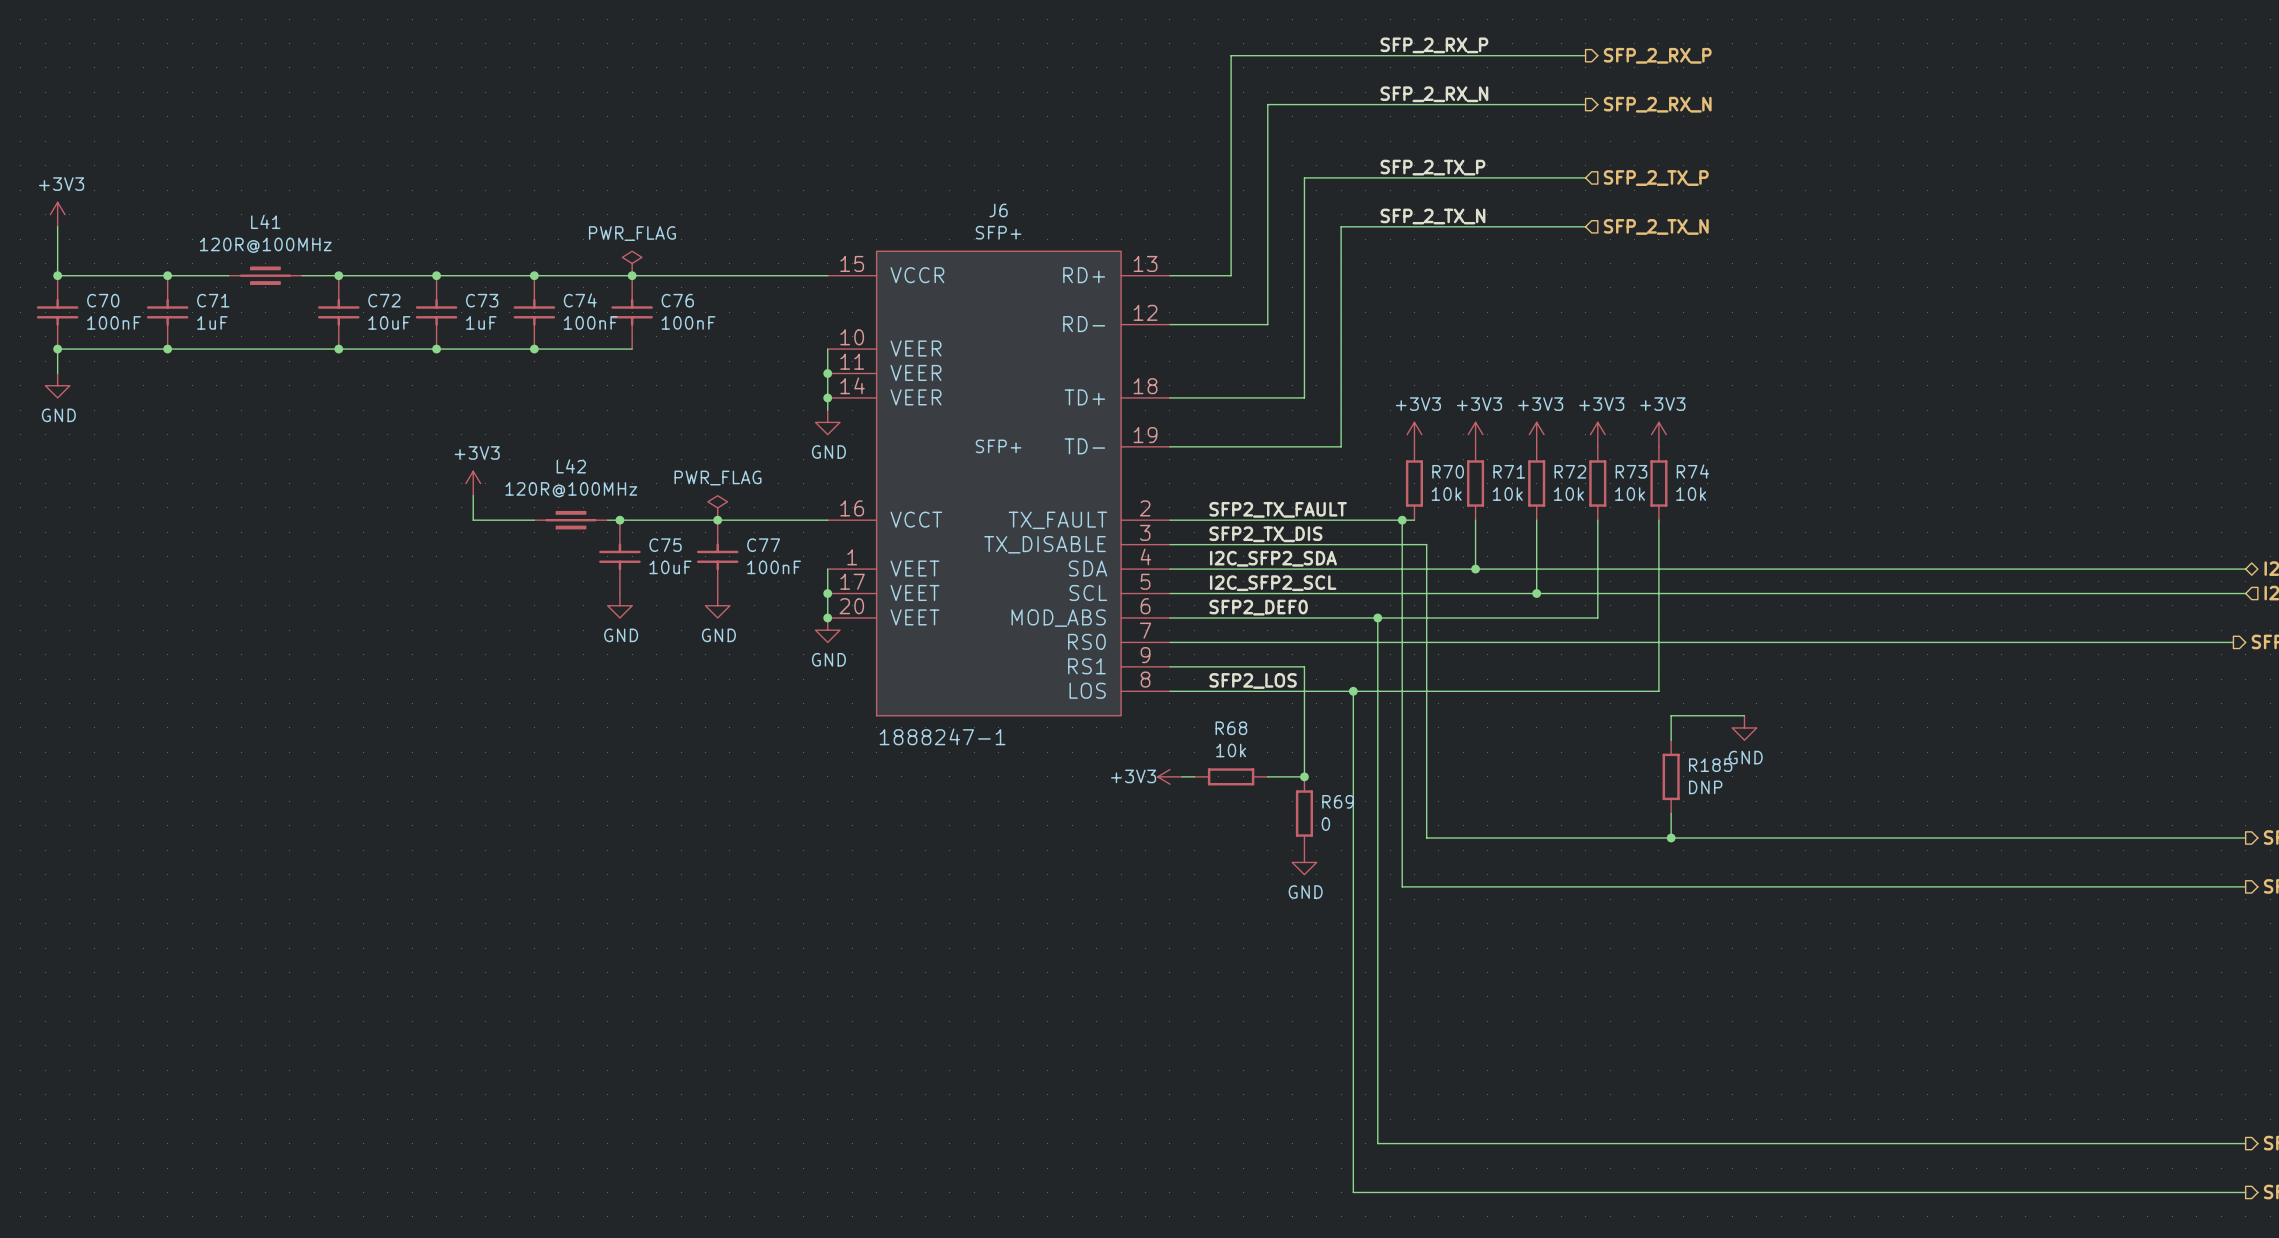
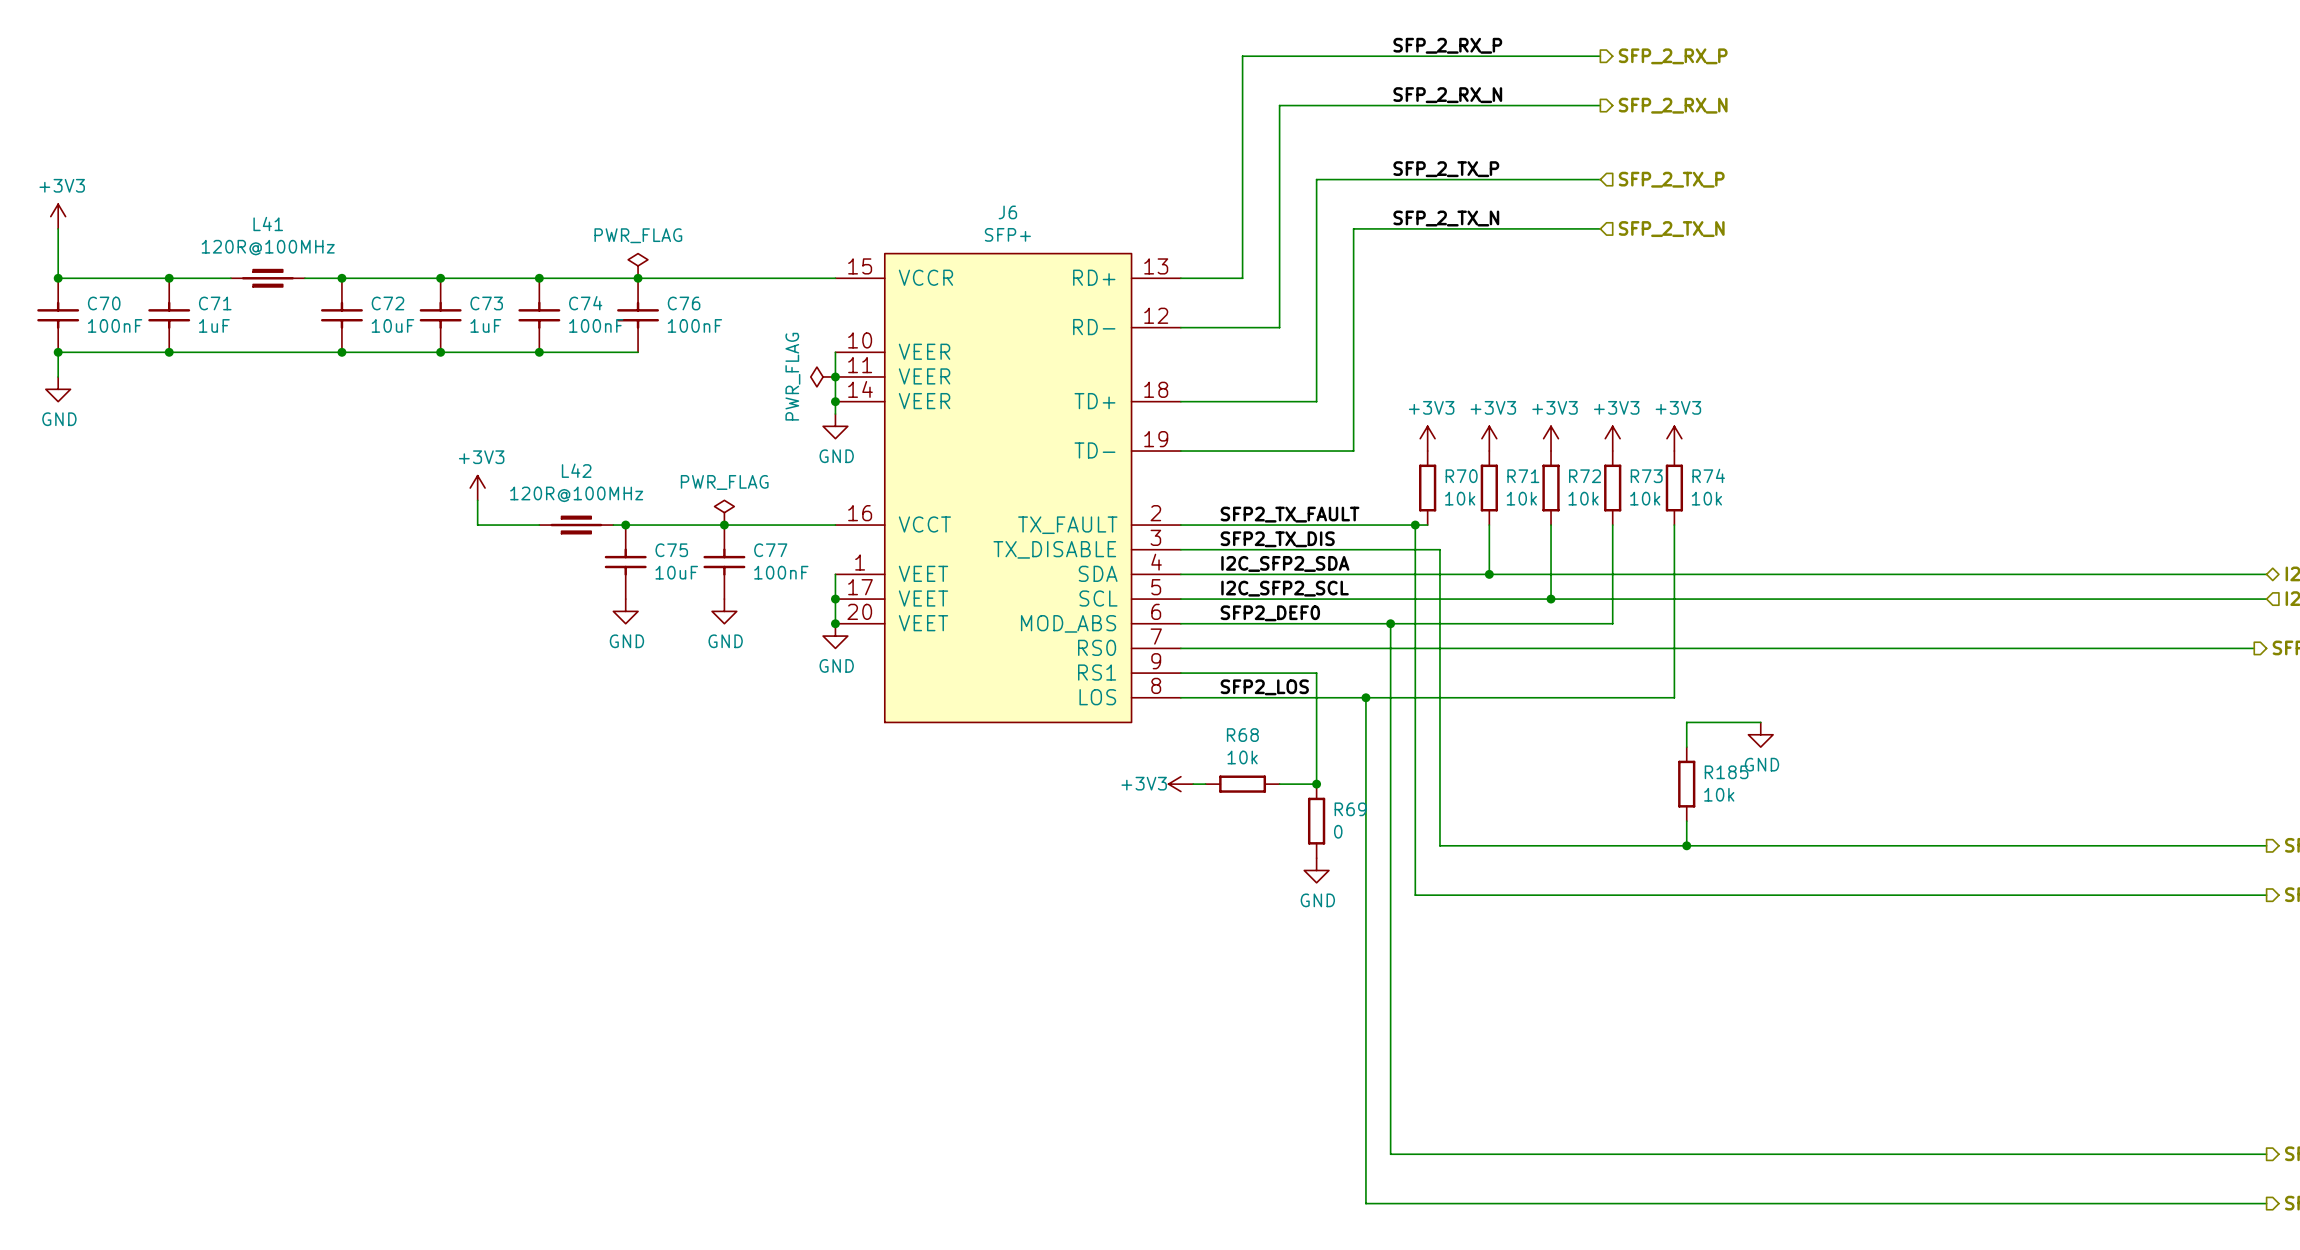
power symbol: none -> PWR_FLAG (823, 376)
J6 text: SFP+ (998, 446) -> none
J6 value: 1888247-1 (942, 736) -> none
R185 text: DNP (1705, 787) -> 10k (1719, 794)

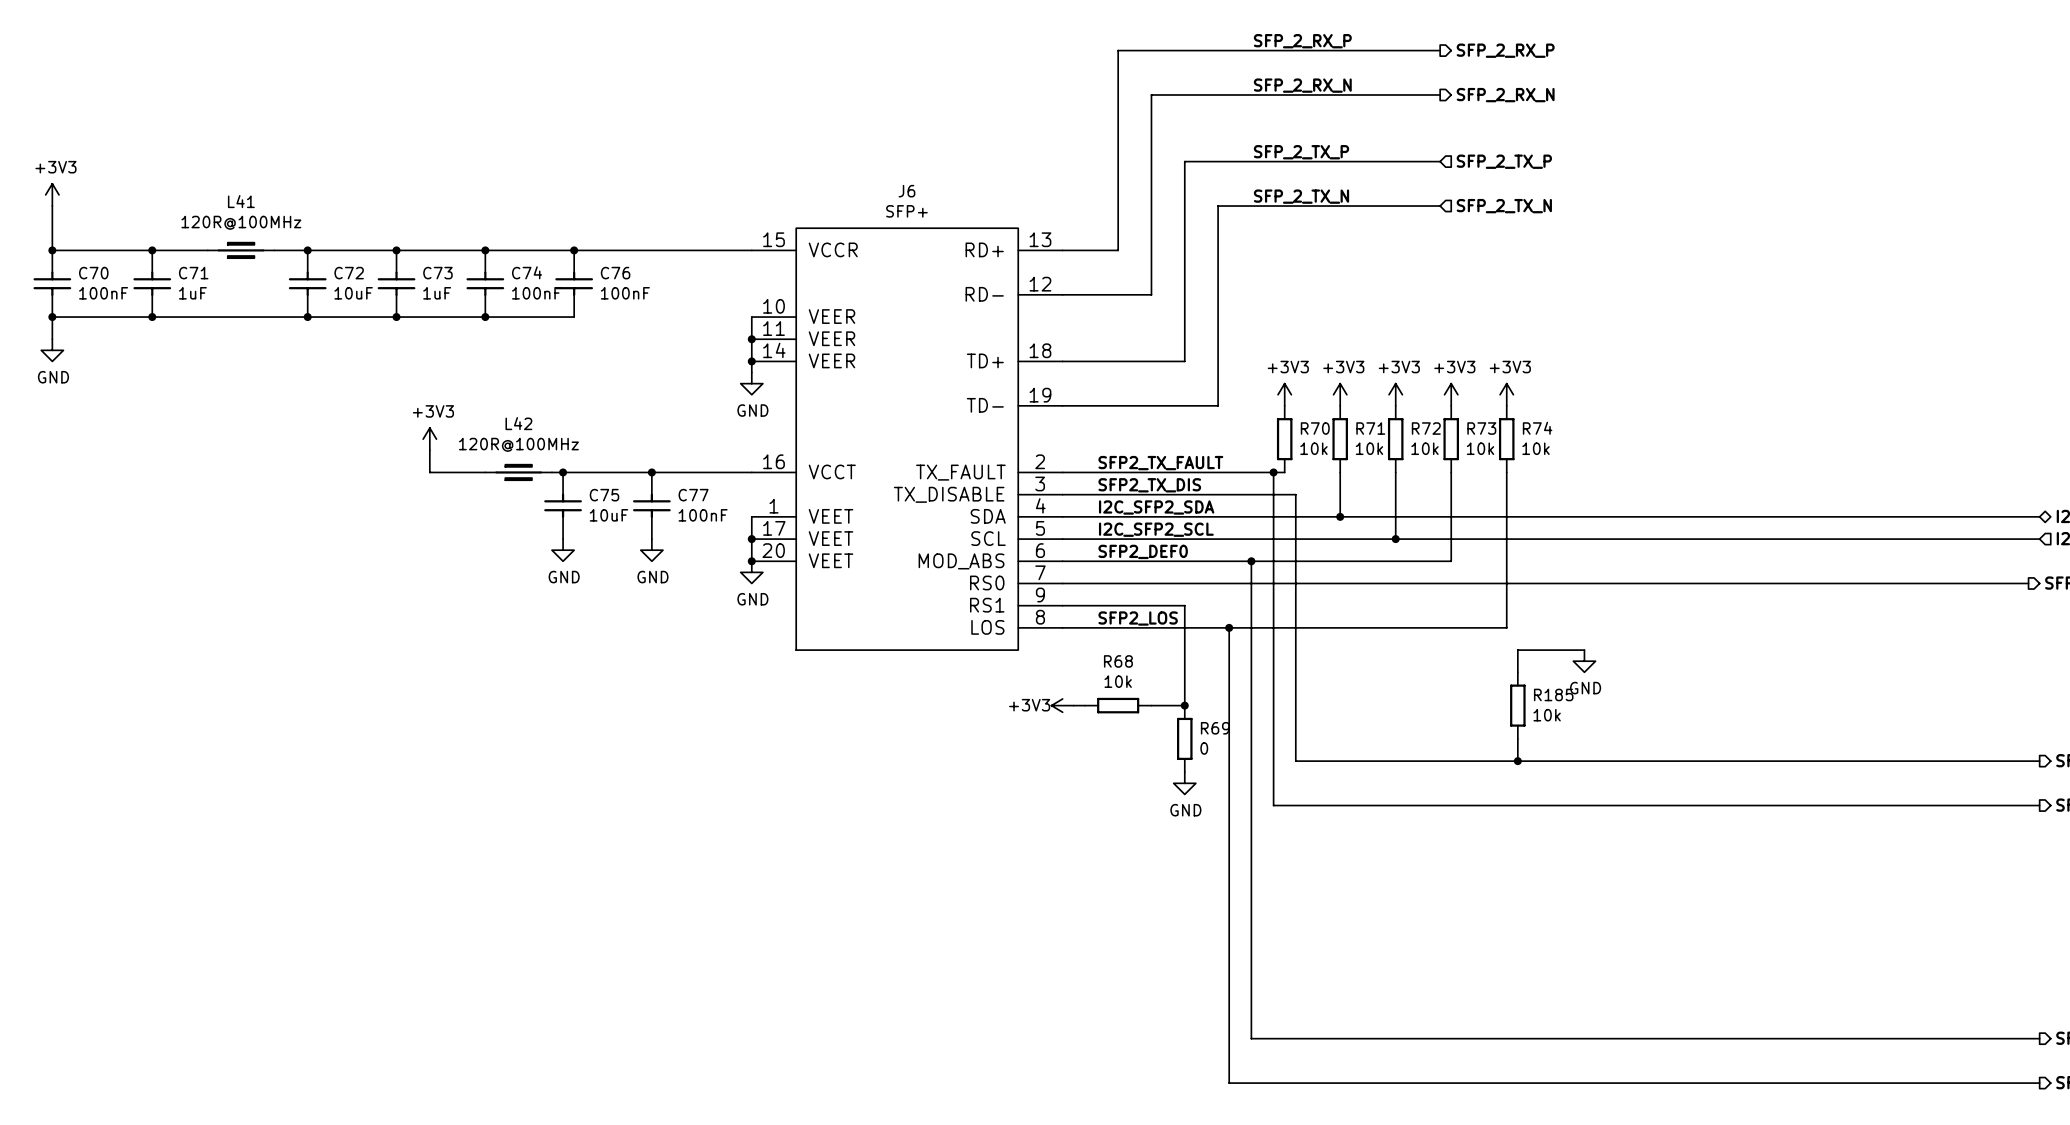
power symbol: PWR_FLAG (638, 265) -> none
power symbol: PWR_FLAG (823, 376) -> none
power symbol: PWR_FLAG (724, 512) -> none

